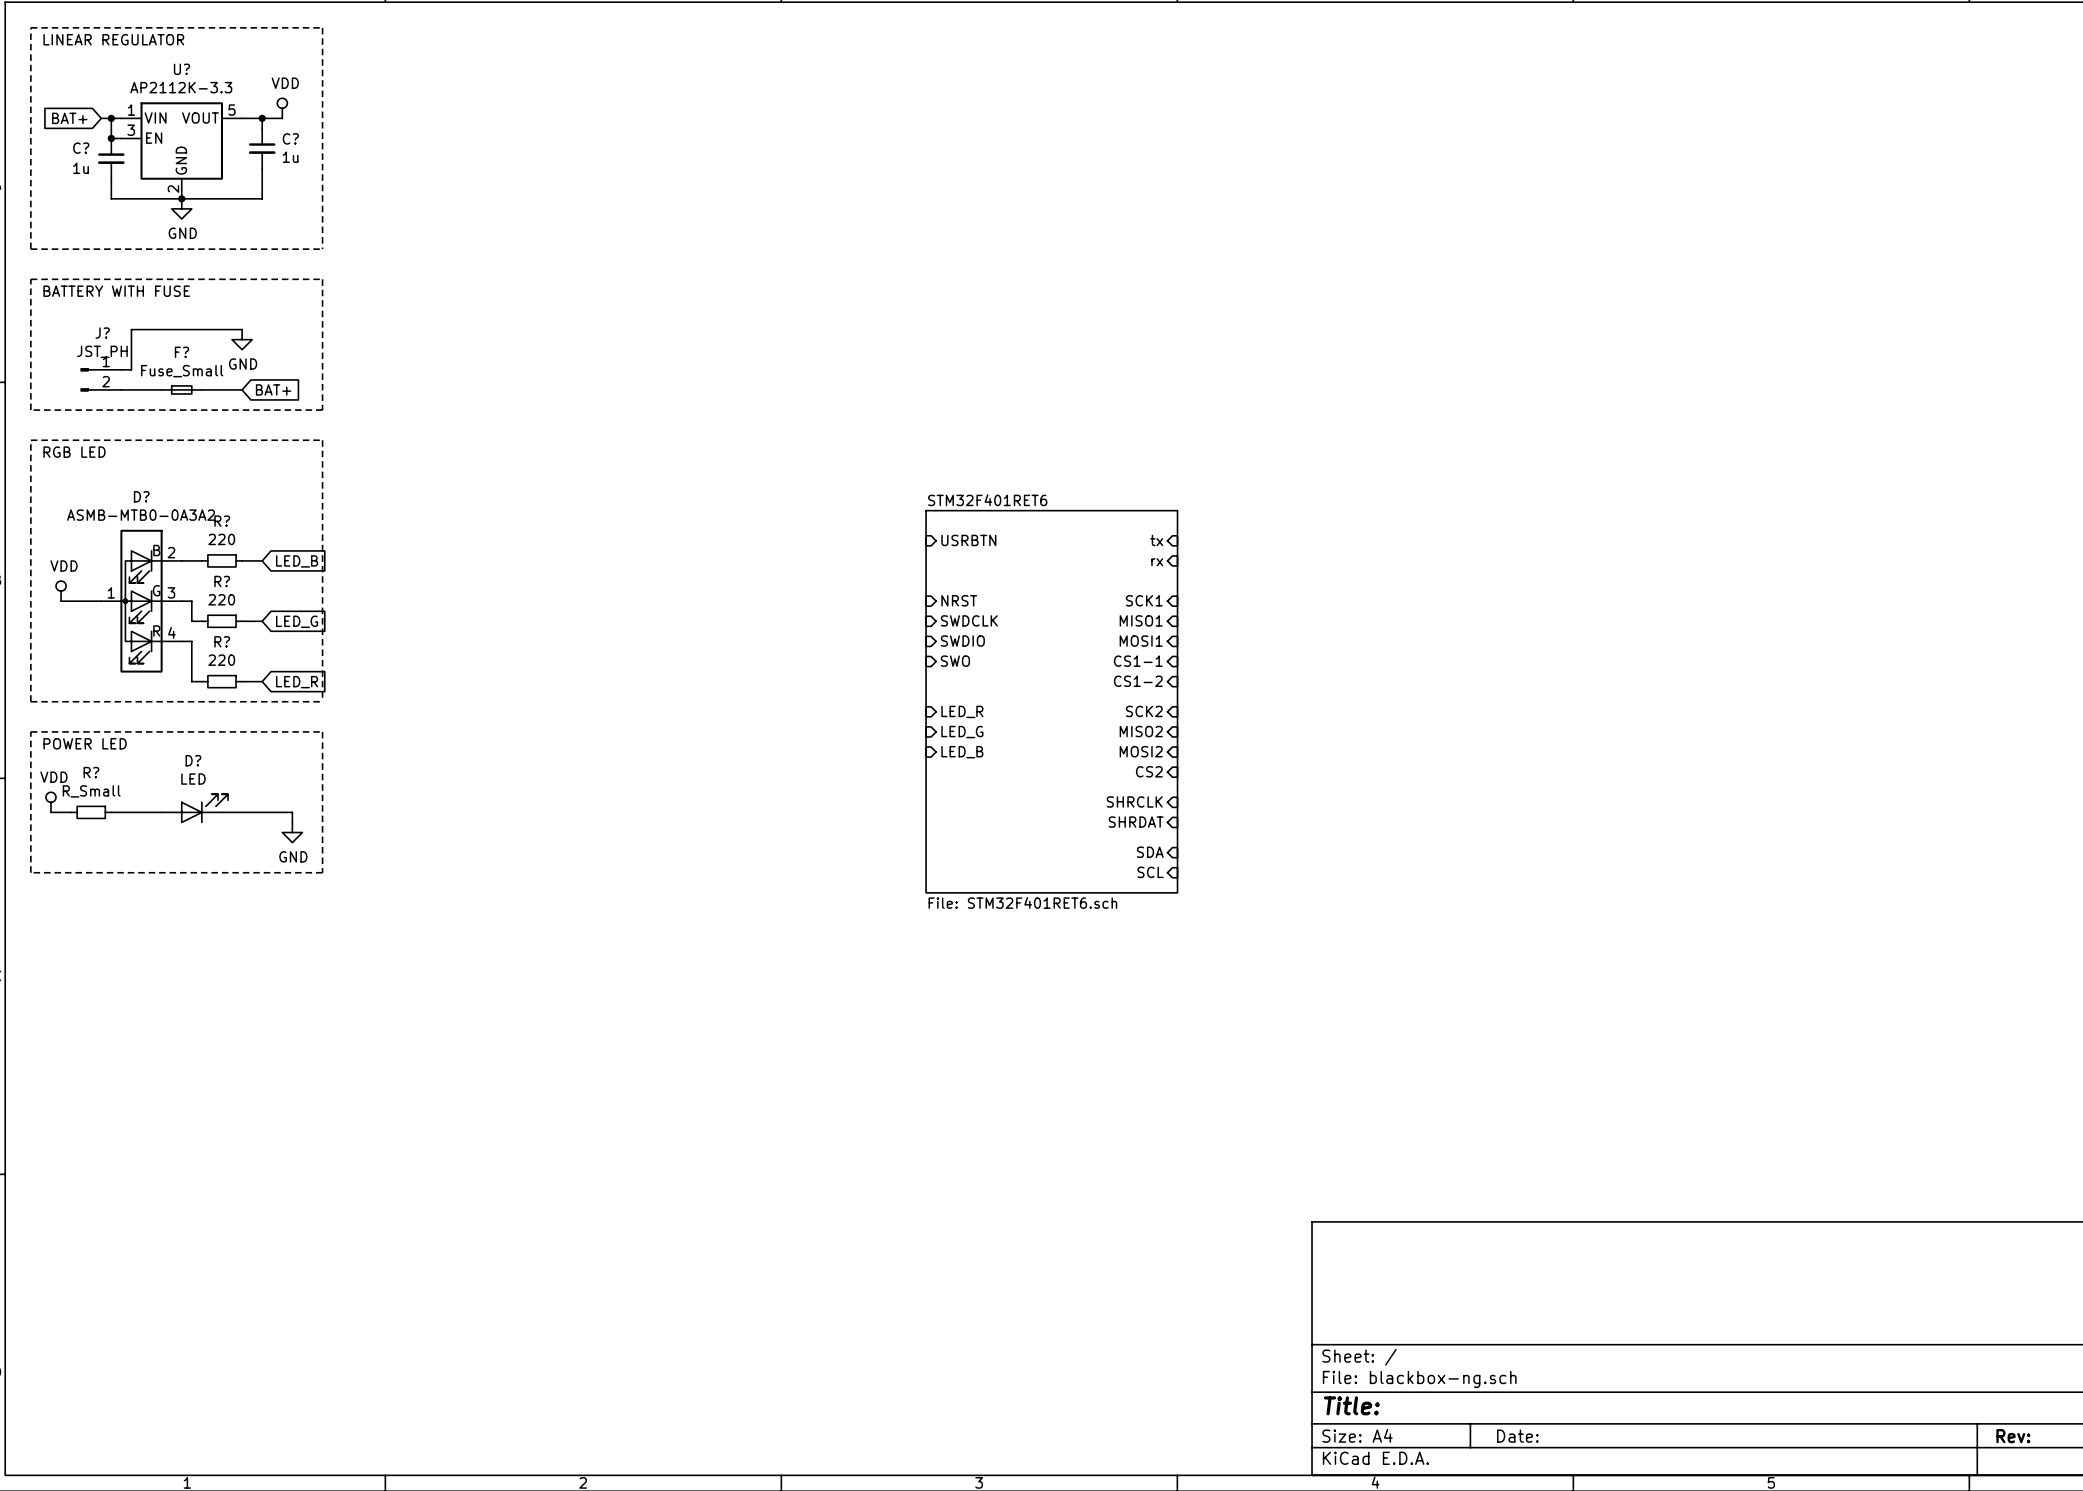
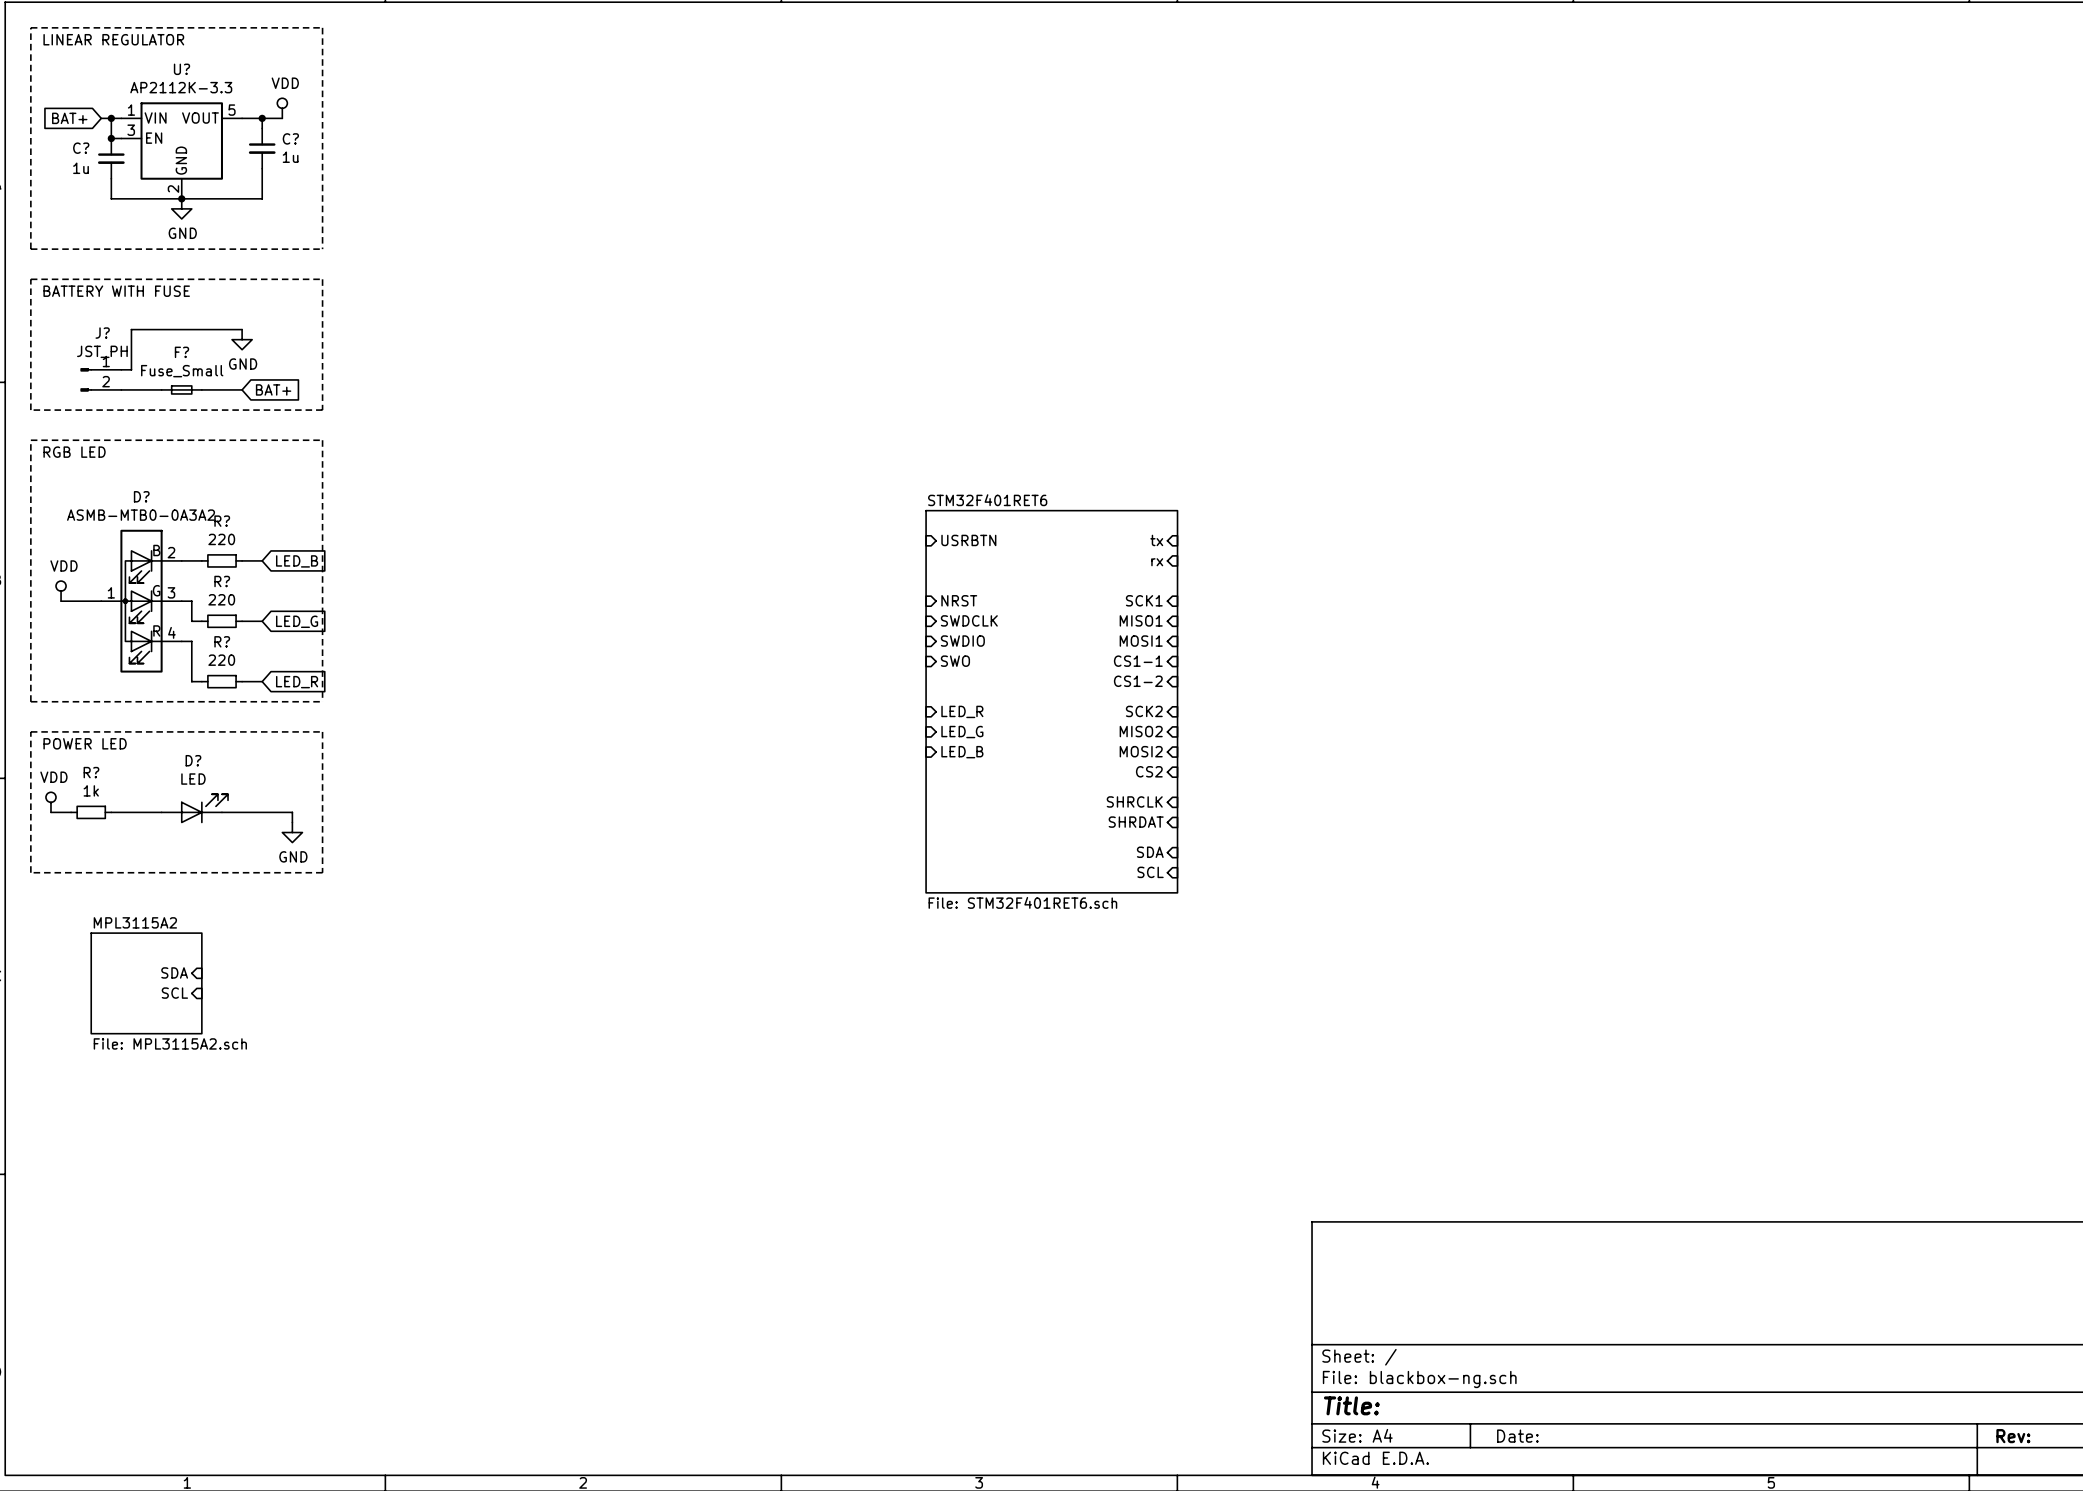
R? value: R_Small (91, 791) -> 1k (91, 790)
sheet pin: none -> SDA (174, 972)
sheet MPL3115A2: none -> File: MPL3115A2.sch (146, 983)
sheet pin: none -> SCL (174, 993)

